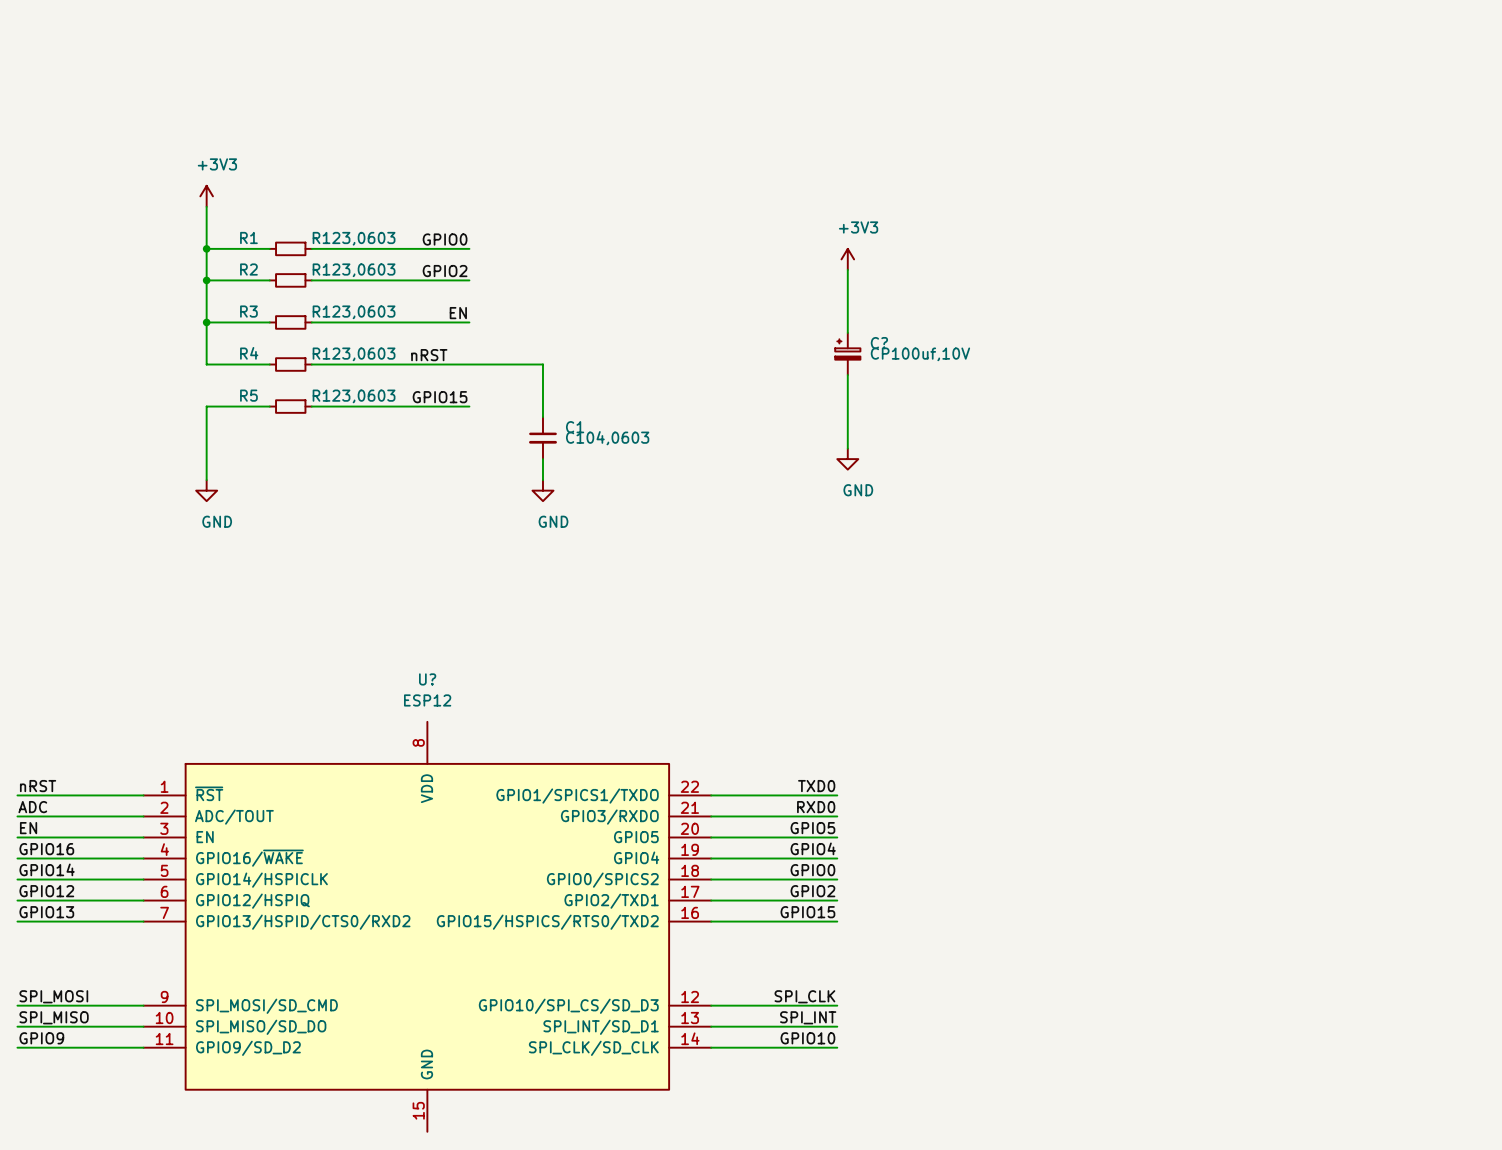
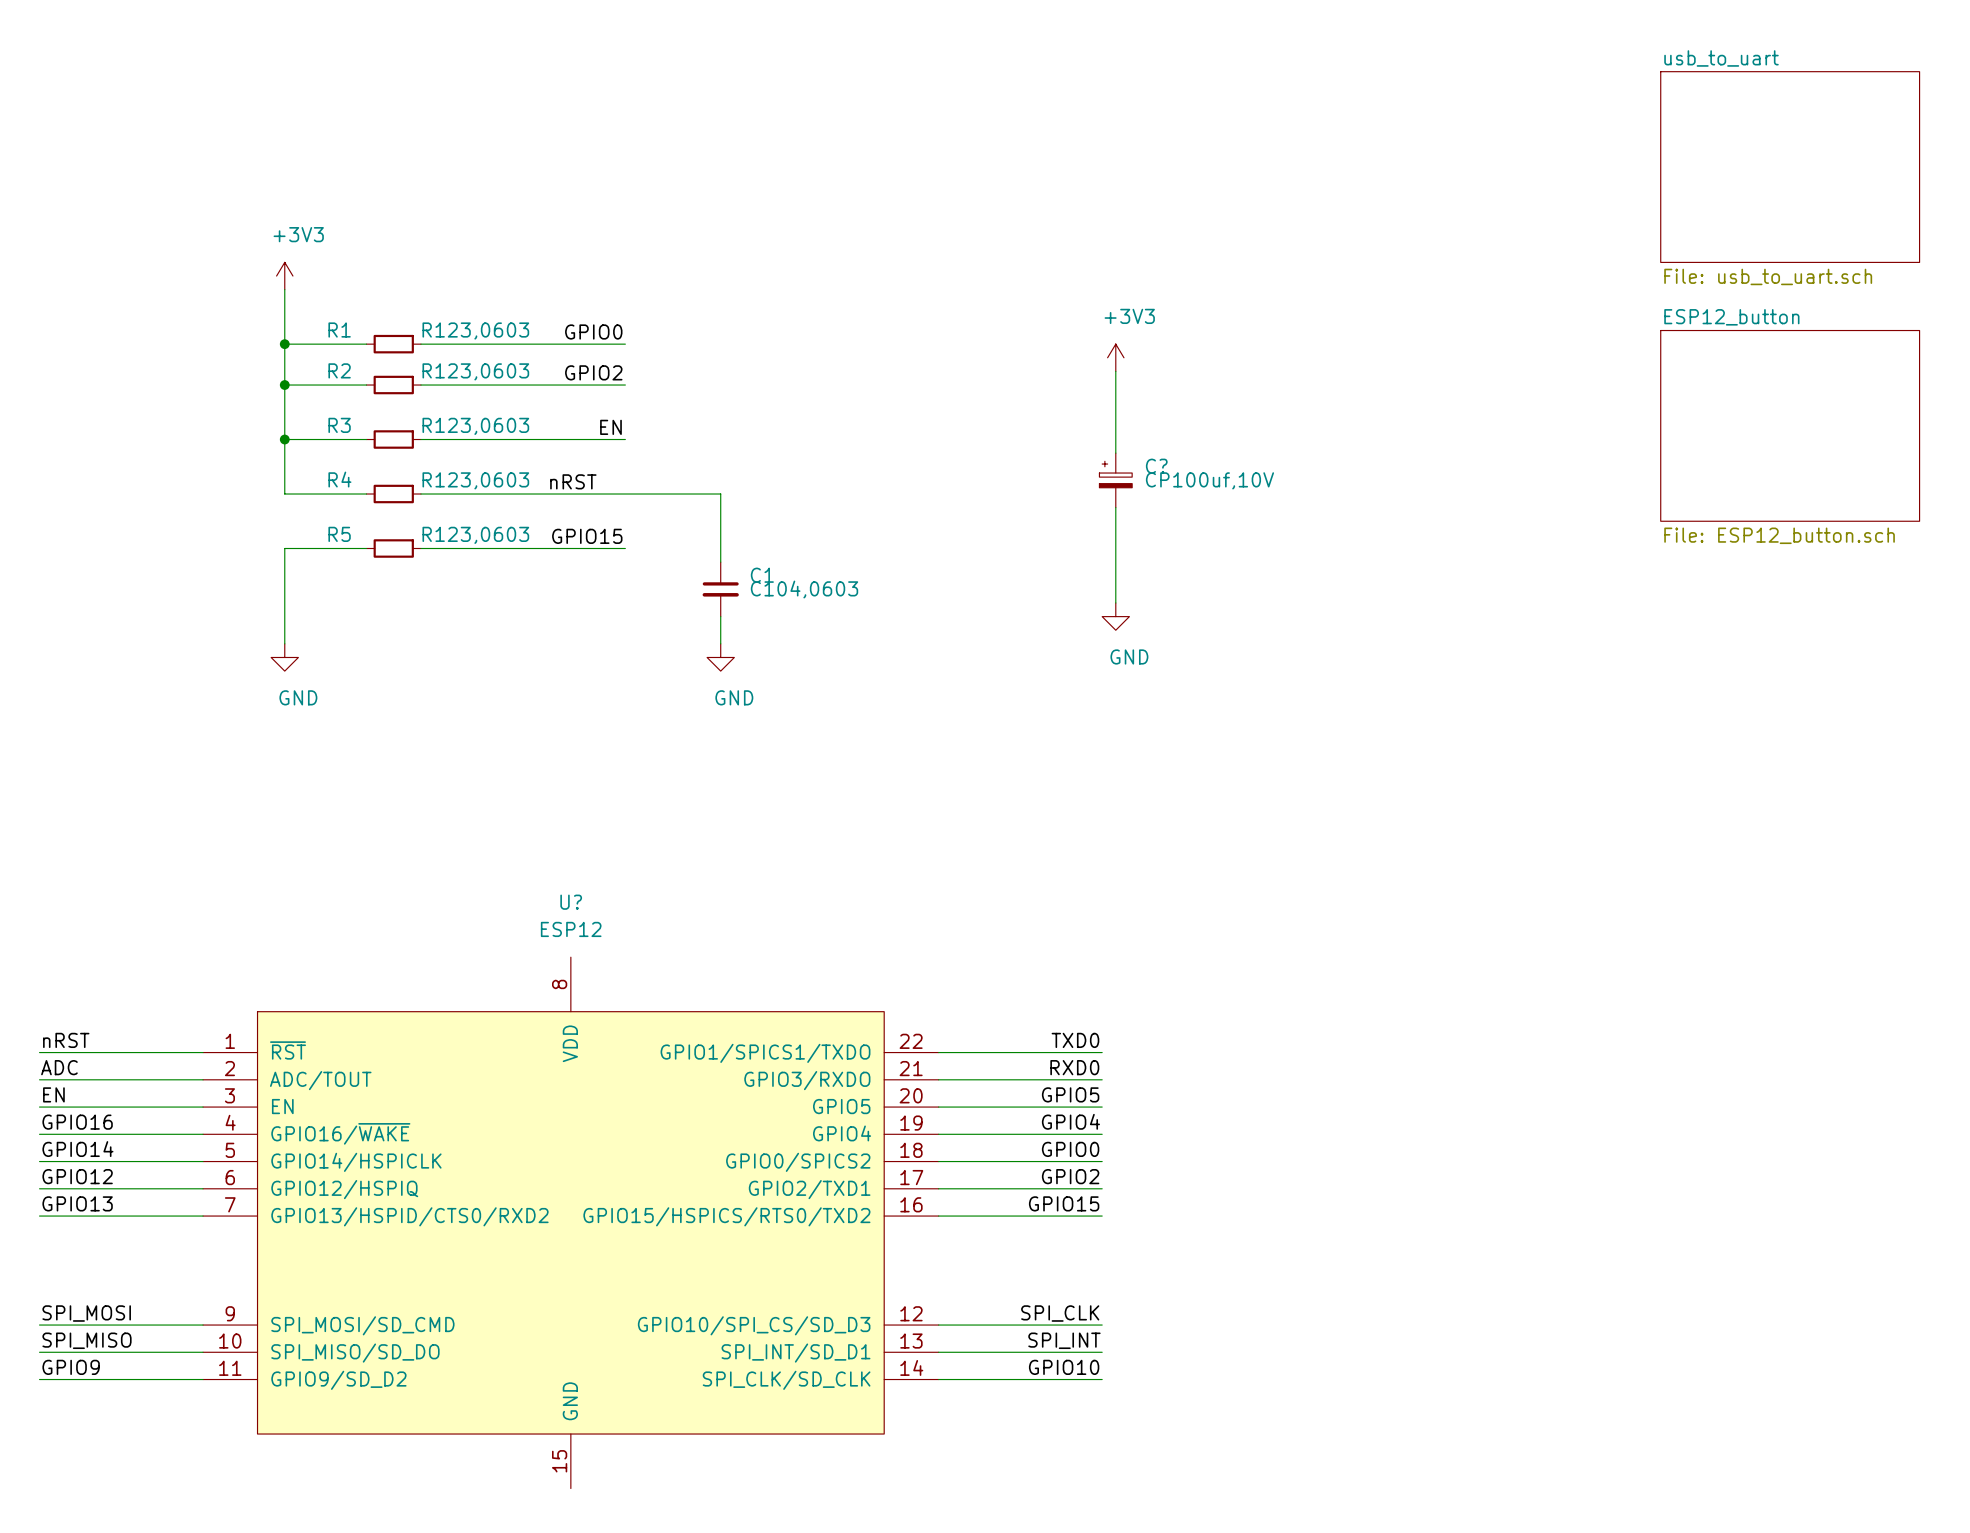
sheet usb_to_uart: none -> File: usb_to_uart.sch (1790, 167)
sheet ESP12_button: none -> File: ESP12_button.sch (1790, 425)

